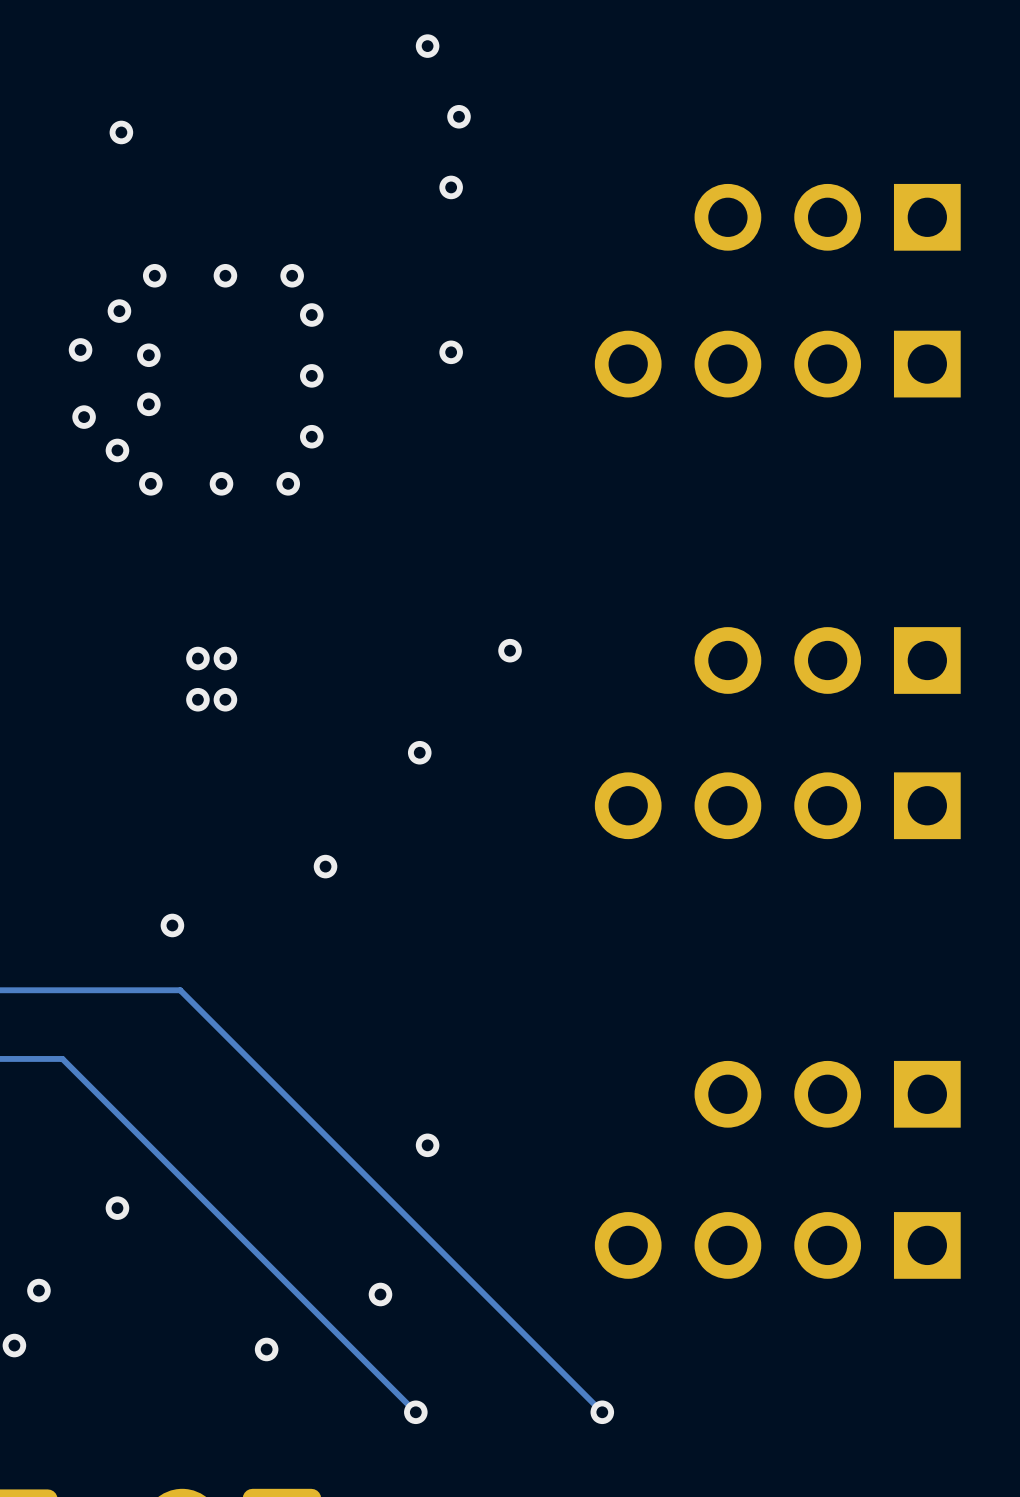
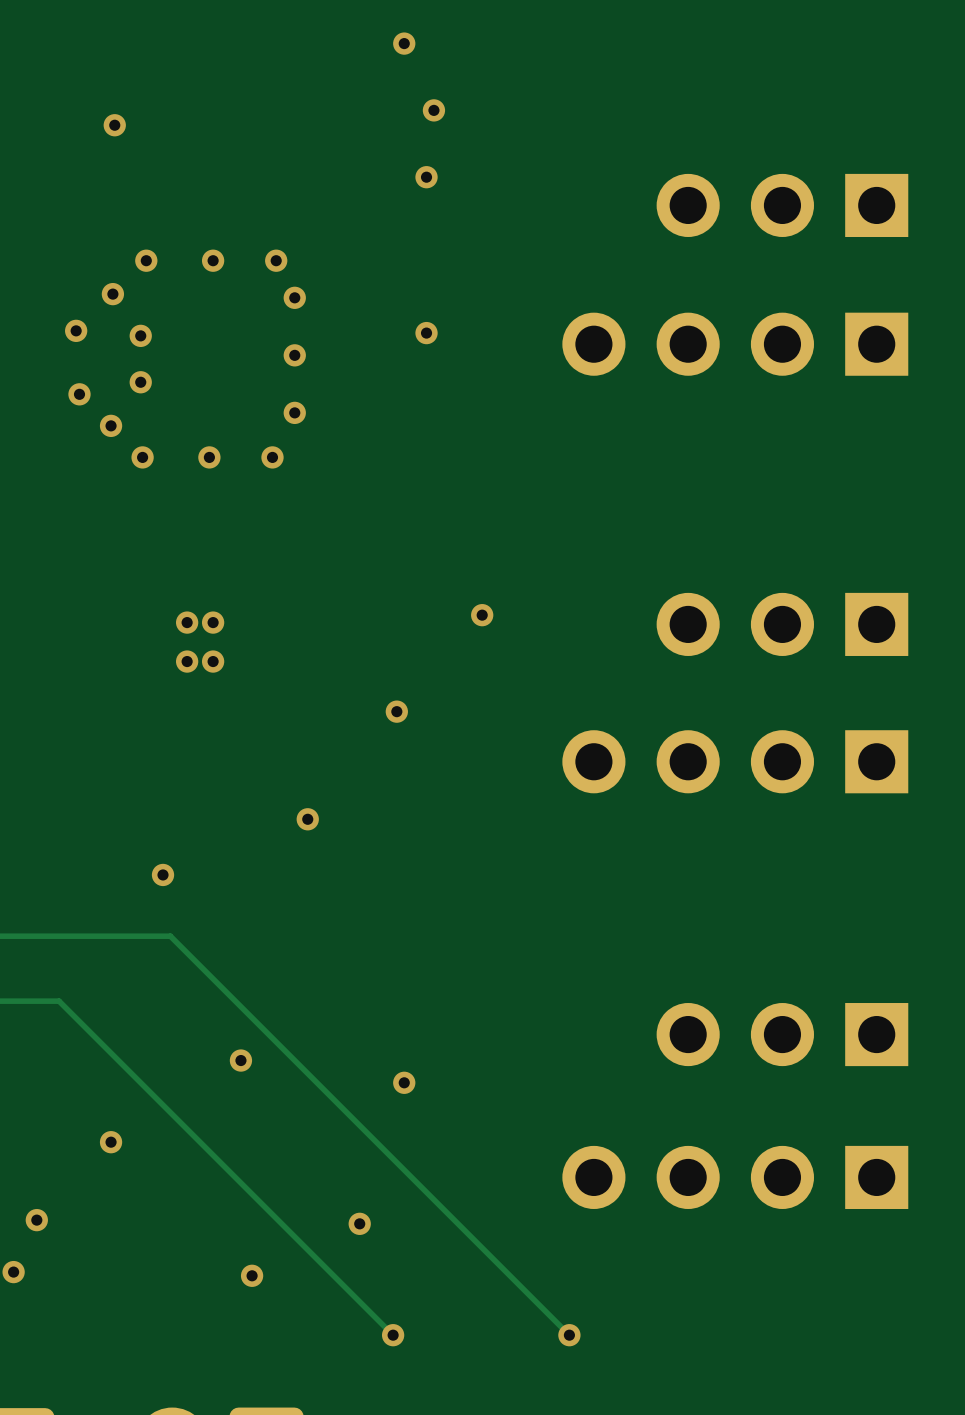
via: none -> (240, 1060)

